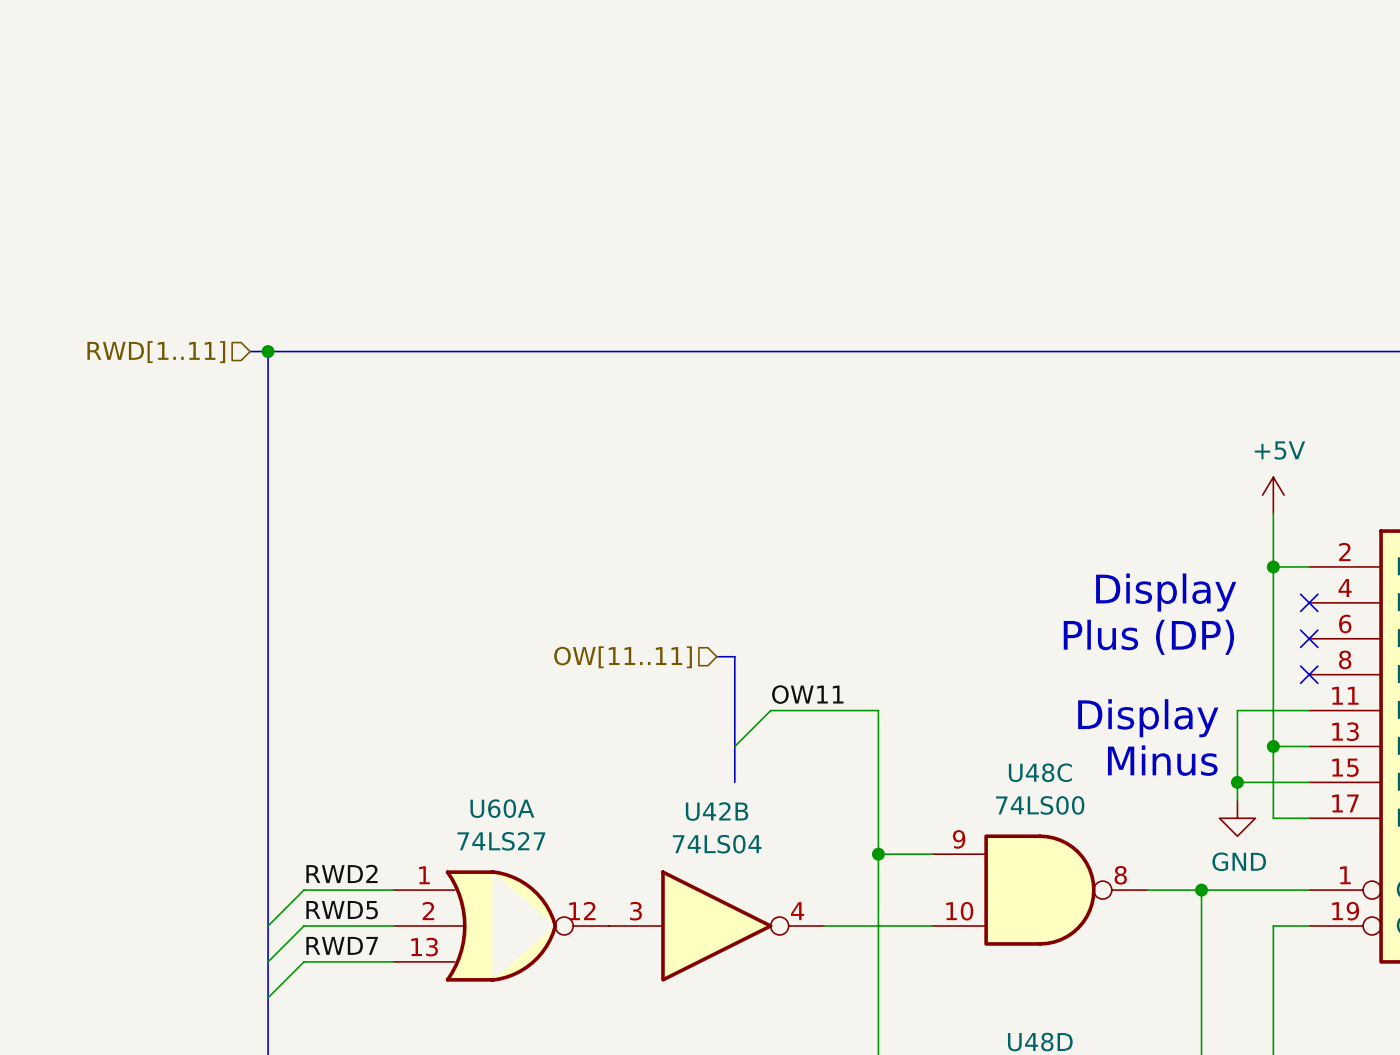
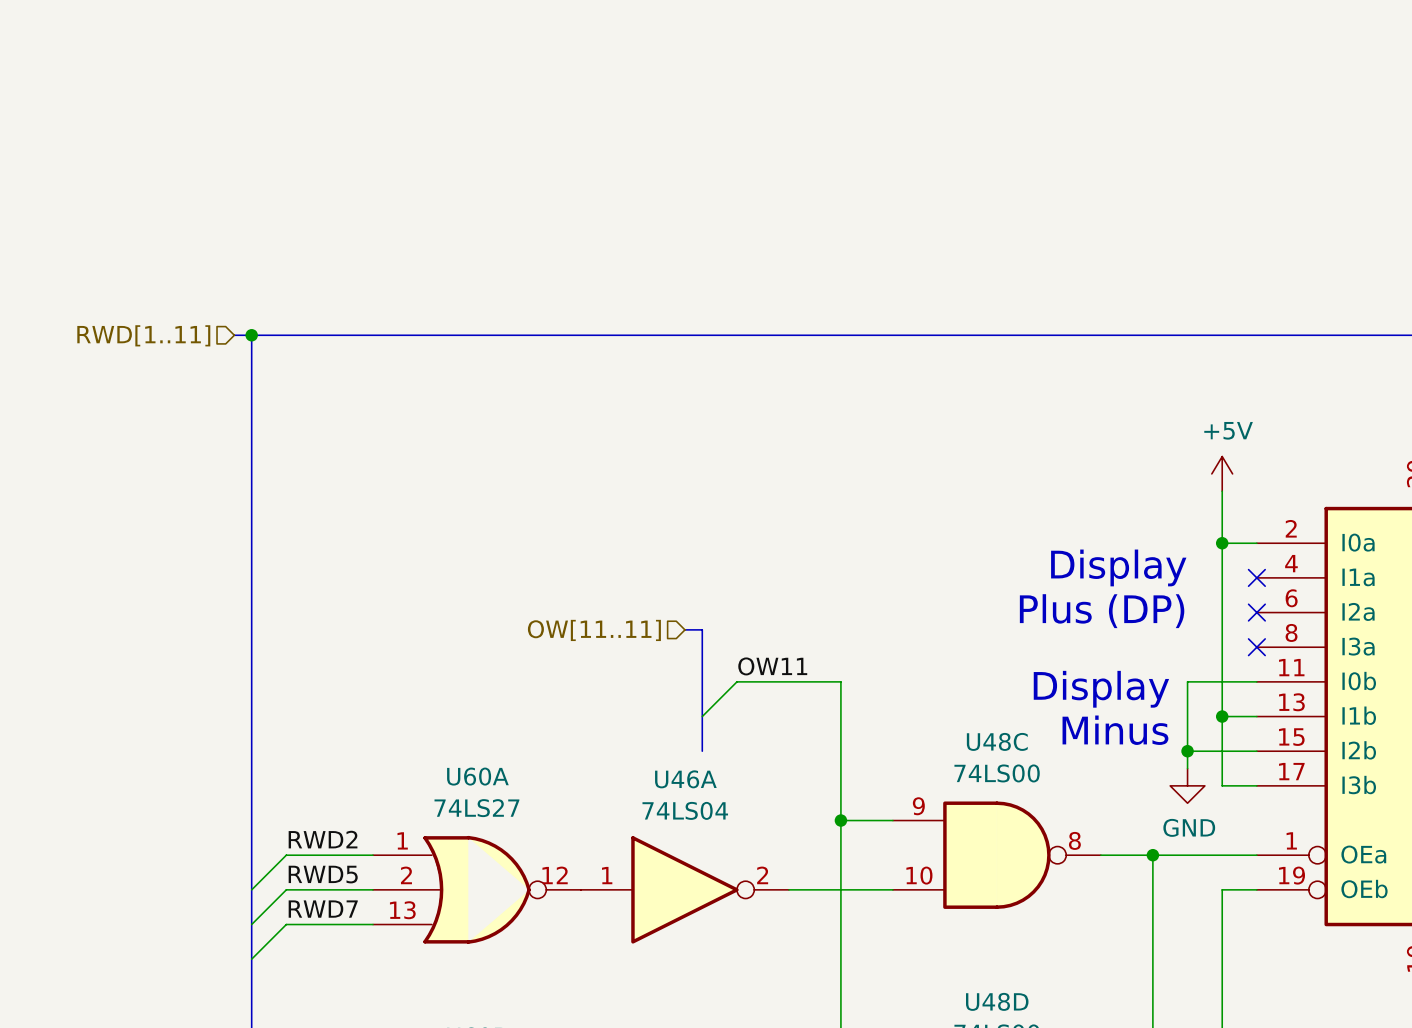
U42B name: U42B (717, 811) -> U46A (685, 779)
U42B pin number: 3 (636, 911) -> 1 (607, 875)
U42B pin number: 4 (797, 911) -> 2 (762, 875)

